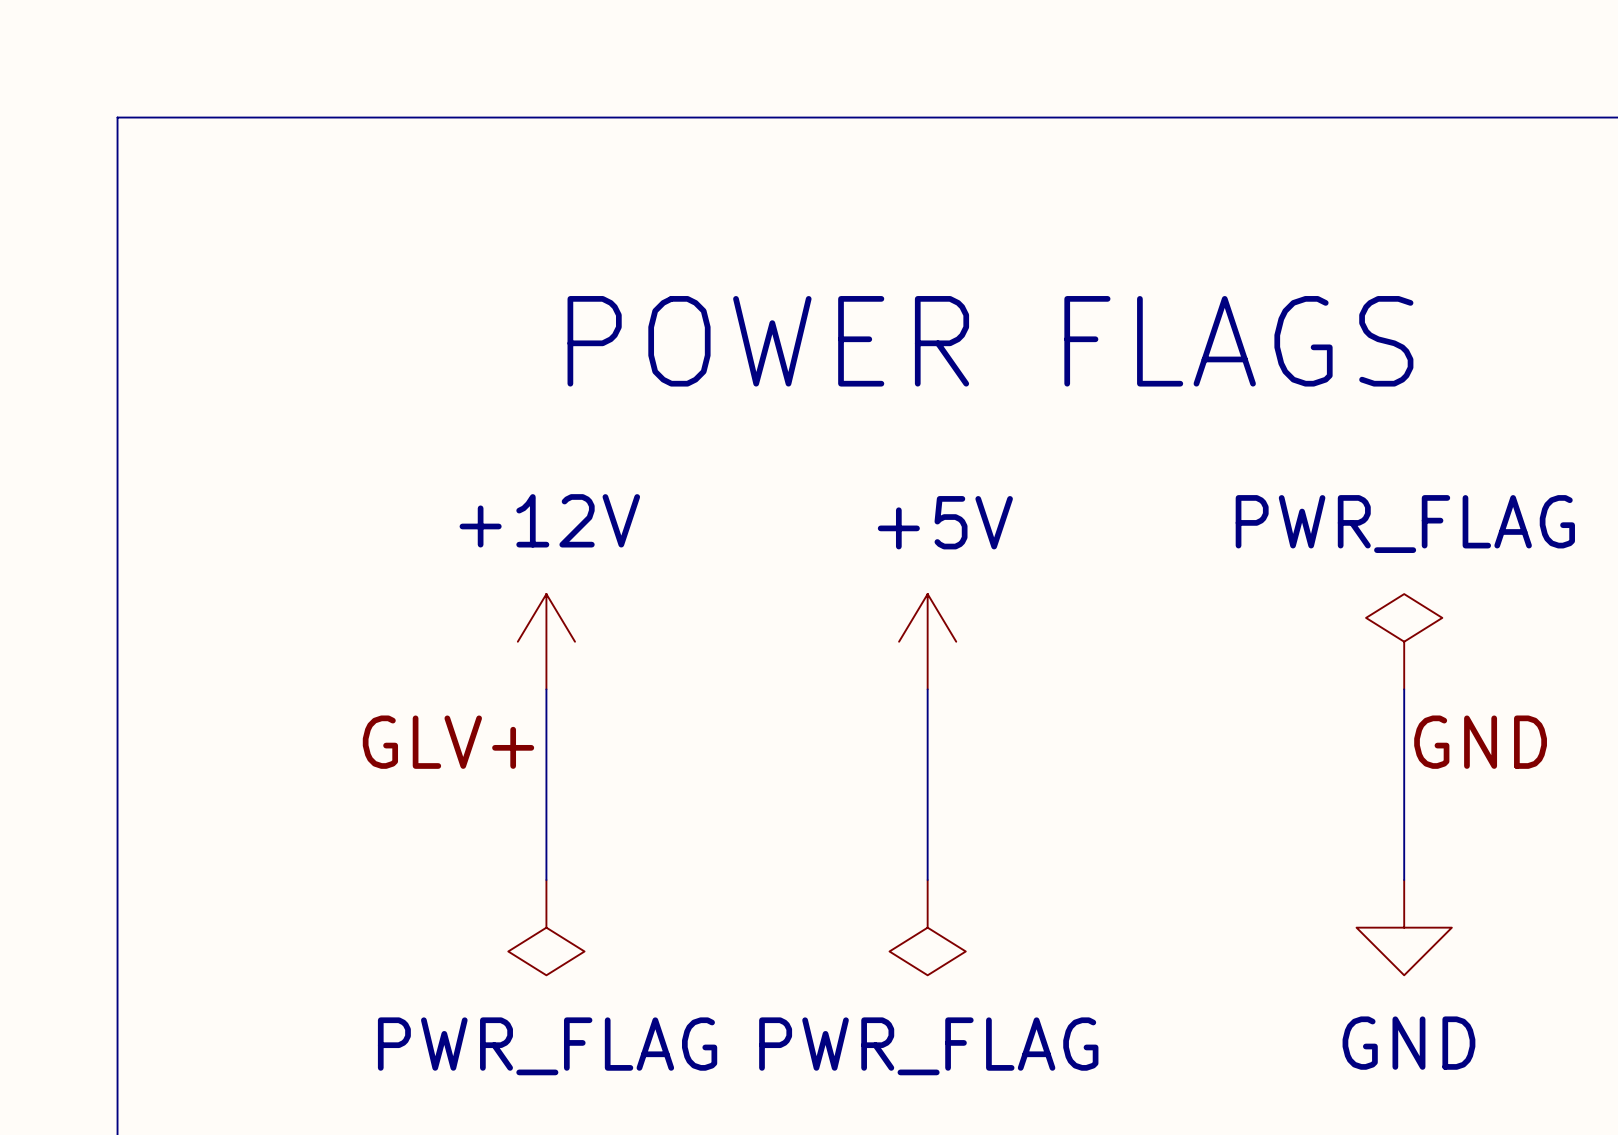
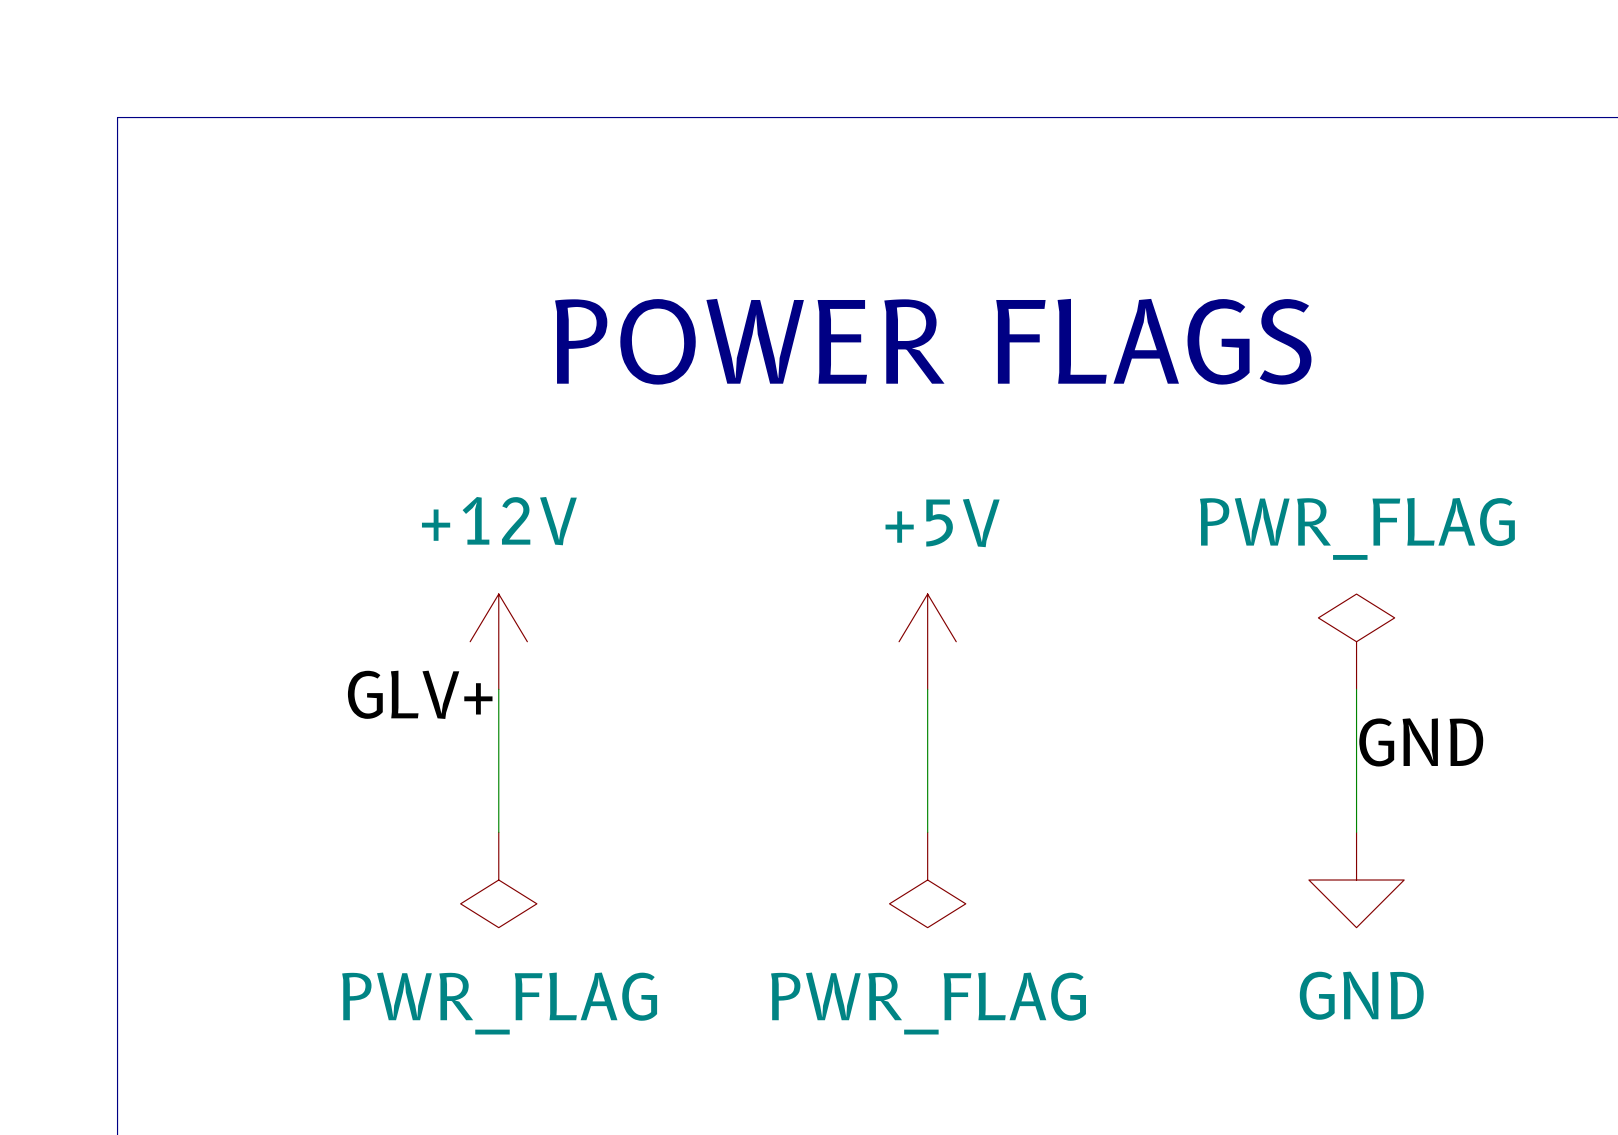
power symbol position: +12V (546, 641) -> +12V (498, 641)
power symbol position: PWR_FLAG (1404, 641) -> PWR_FLAG (1356, 641)
wire: none -> (498, 689) (498, 832)
wire: (546, 689) (546, 880) -> none
wire: none -> (1356, 689) (1356, 832)
wire: (1404, 689) (1404, 880) -> none
label position: GLV+ (448, 742) -> GLV+ (420, 694)
label position: GND (1480, 742) -> GND (1421, 742)
power symbol position: PWR_FLAG (546, 927) -> PWR_FLAG (498, 880)
power symbol position: PWR_FLAG (927, 927) -> PWR_FLAG (927, 880)
power symbol position: GND (1404, 927) -> GND (1356, 880)

